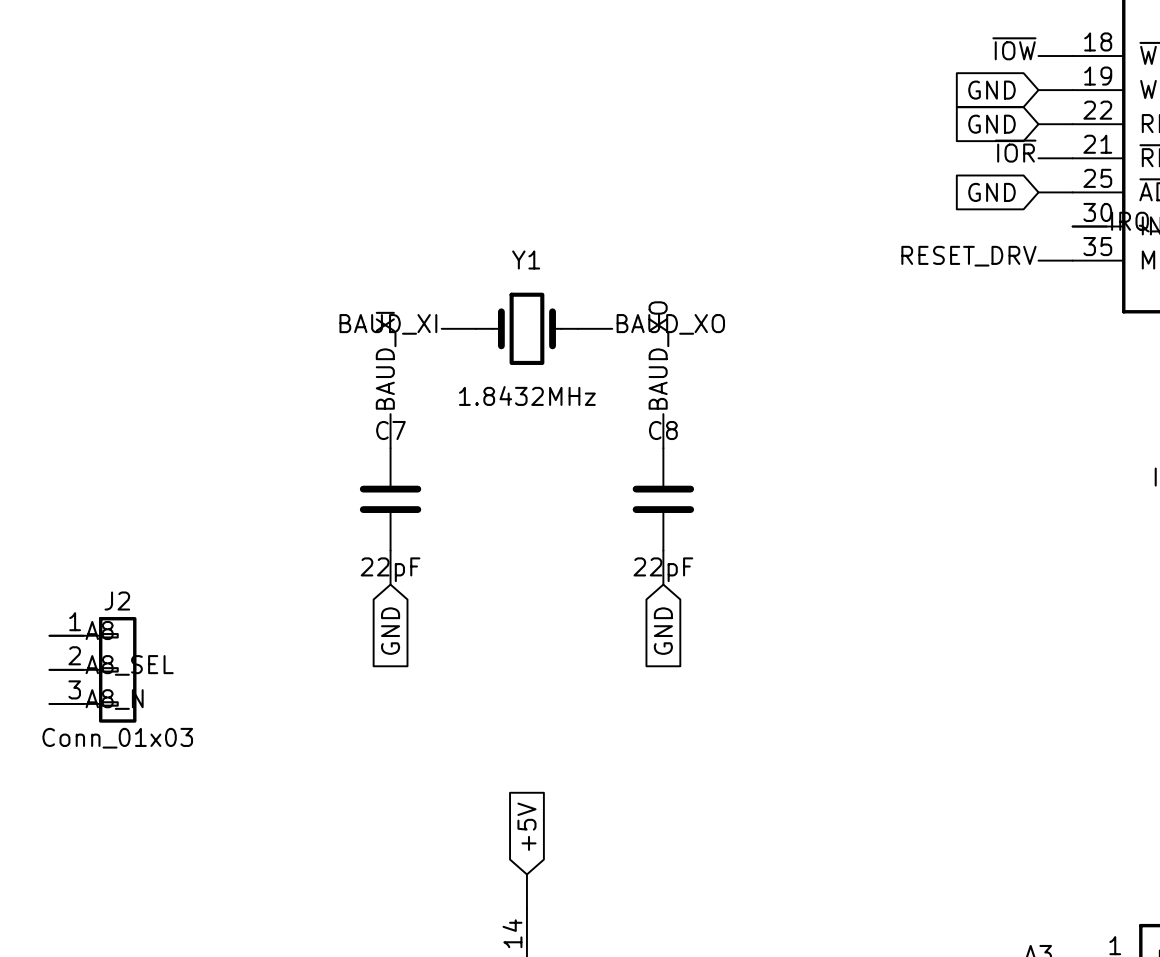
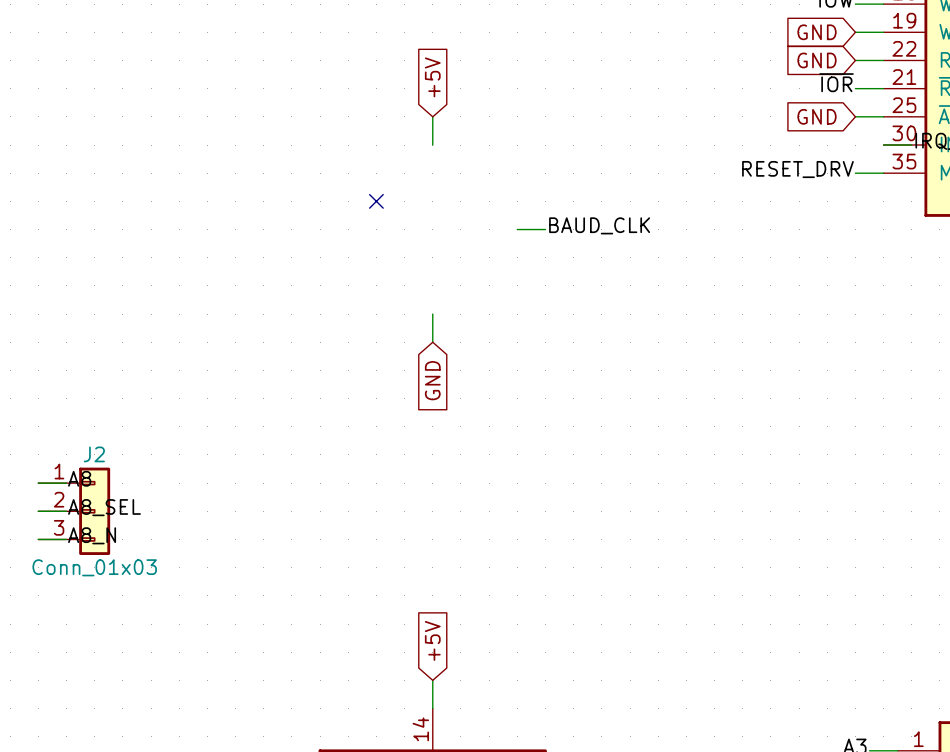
global label: none -> +5V (432, 77)
no-connect mark: none -> (376, 201)
label: BAUD_XI (388, 324) -> none
label: BAUD_XO (670, 324) -> none
label: none -> BAUD_CLK (599, 225)
wire: (441, 328) (475, 328) -> none
Y1: 1.8432MHz (526, 328) -> none
wire: (578, 328) (612, 328) -> (517, 229) (545, 229)
label: BAUD_XO (658, 355) -> none
label: BAUD_XI (386, 360) -> none
wire: (390, 414) (390, 448) -> (432, 314) (432, 342)
wire: (663, 414) (663, 448) -> (432, 116) (432, 145)
C7: 22pF (390, 499) -> none
C8: 22pF (663, 499) -> none
global label: none -> GND (432, 380)
wire: (390, 550) (390, 584) -> none
wire: (663, 550) (663, 584) -> none
global label: GND (390, 631) -> none
global label: GND (663, 631) -> none

